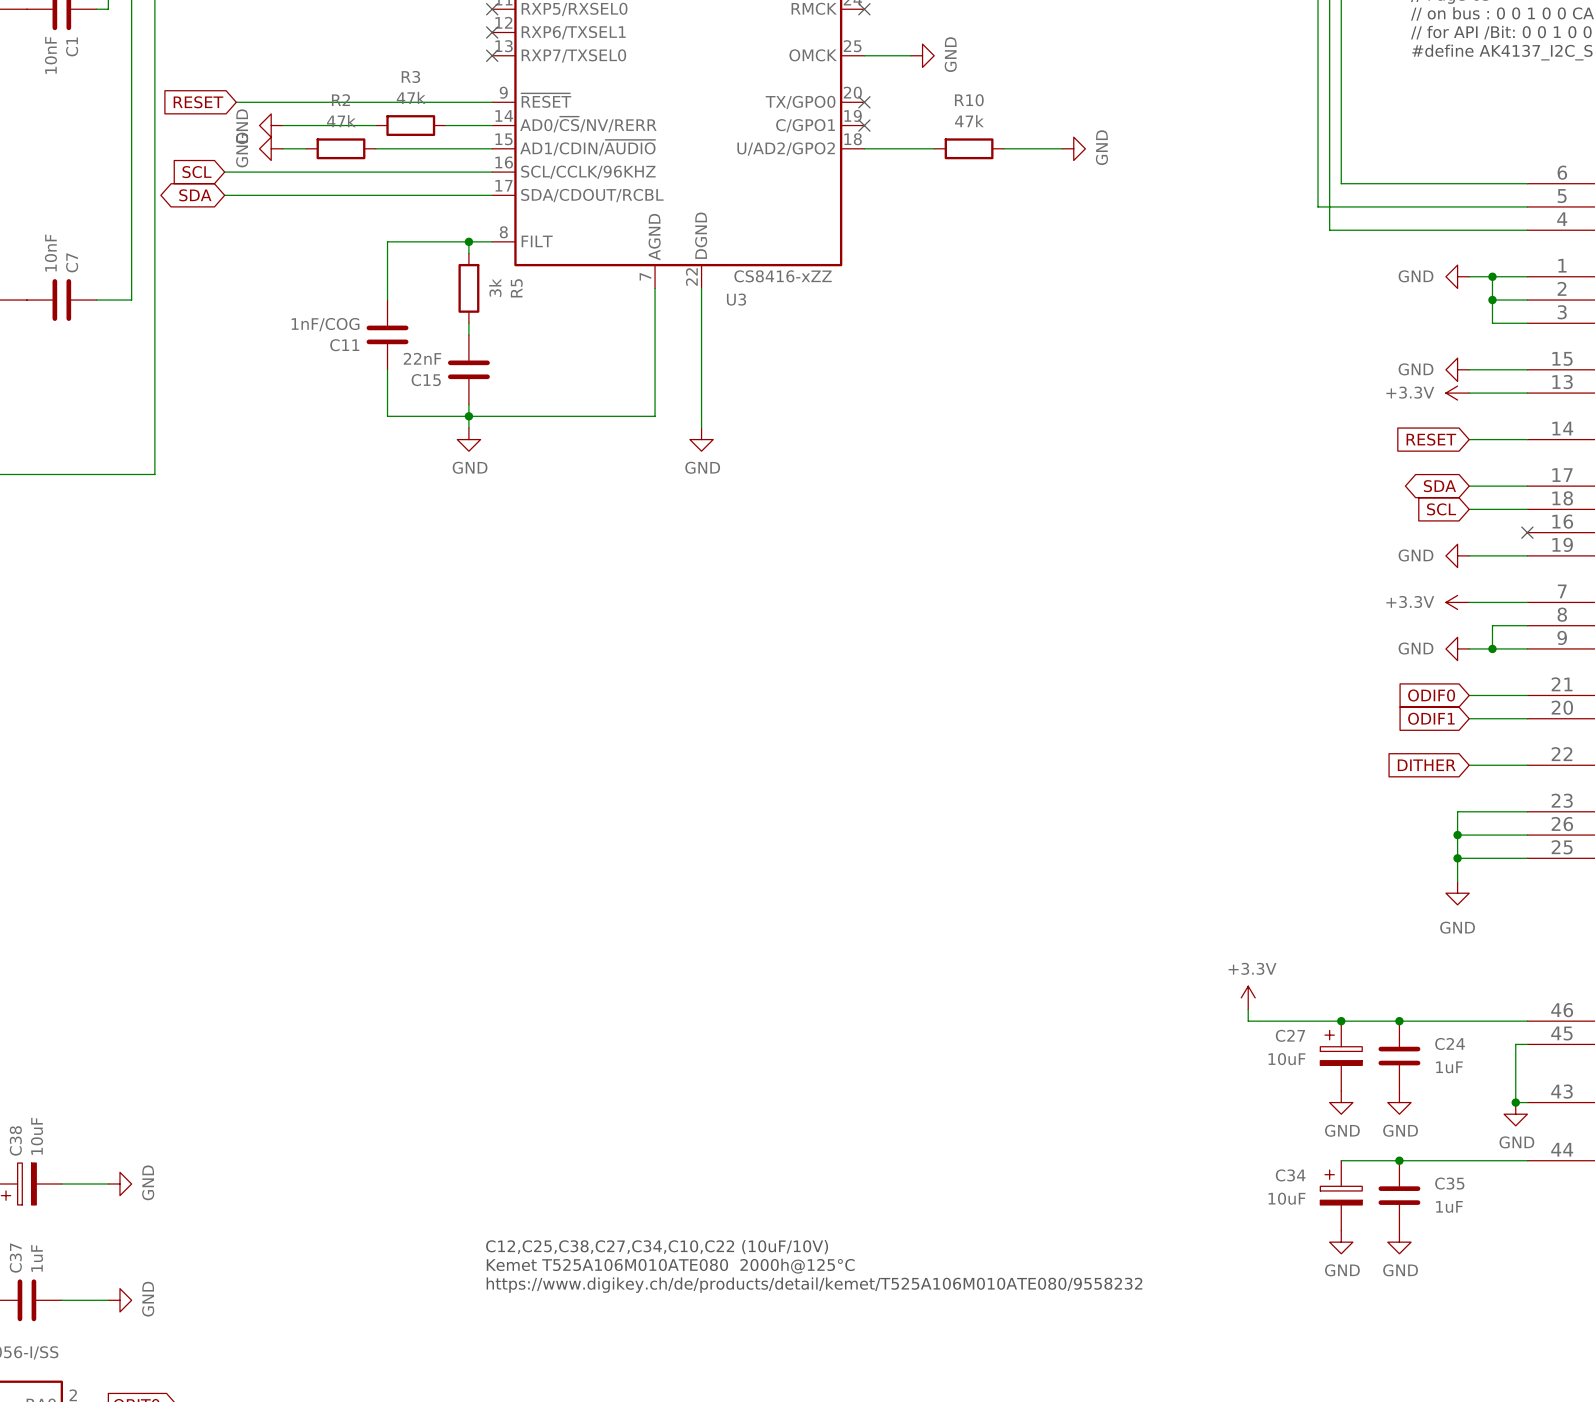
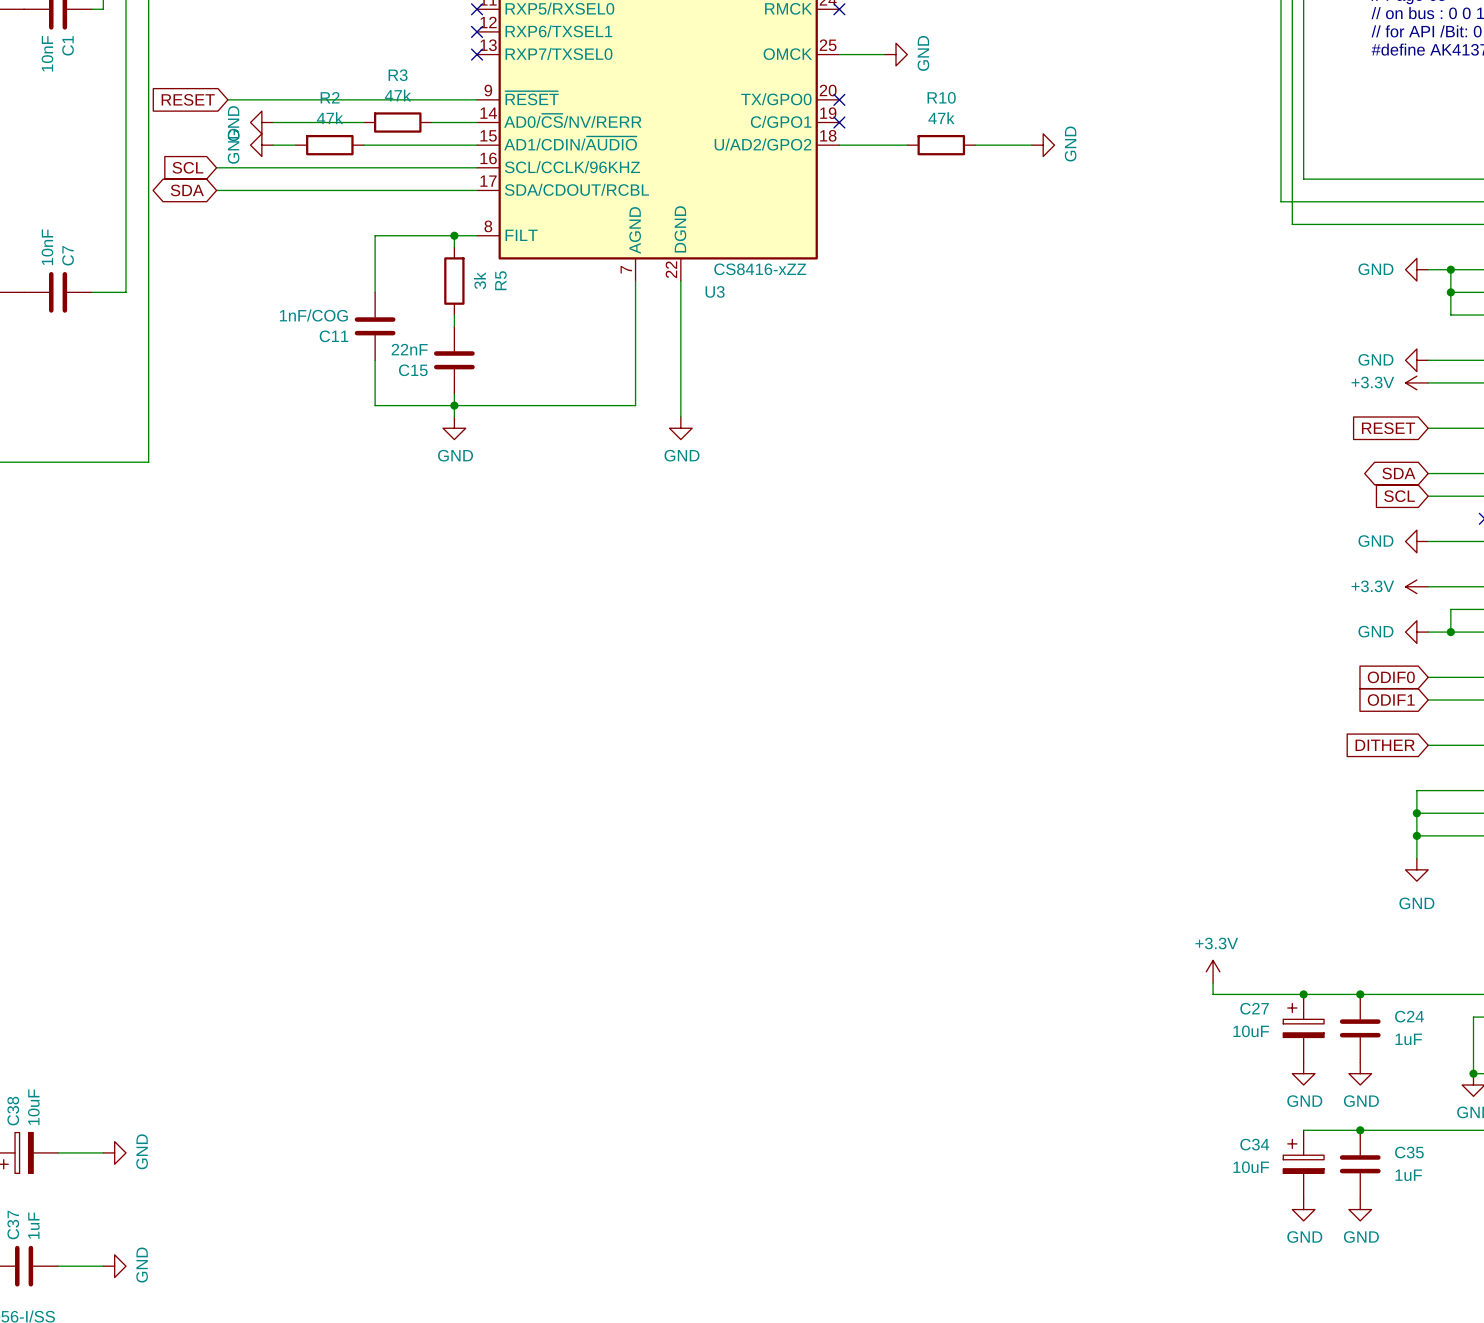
text: C12,C25,C38,C27,C34,C10,C22 (10uF/10V) (657, 1247) -> none
text: Kemet T525A106M010ATE080 2000h@125°C (670, 1266) -> none
text: https://www.digikey.ch/de/products/detail/kemet/T525A106M010ATE080/9558232 (814, 1285) -> none

